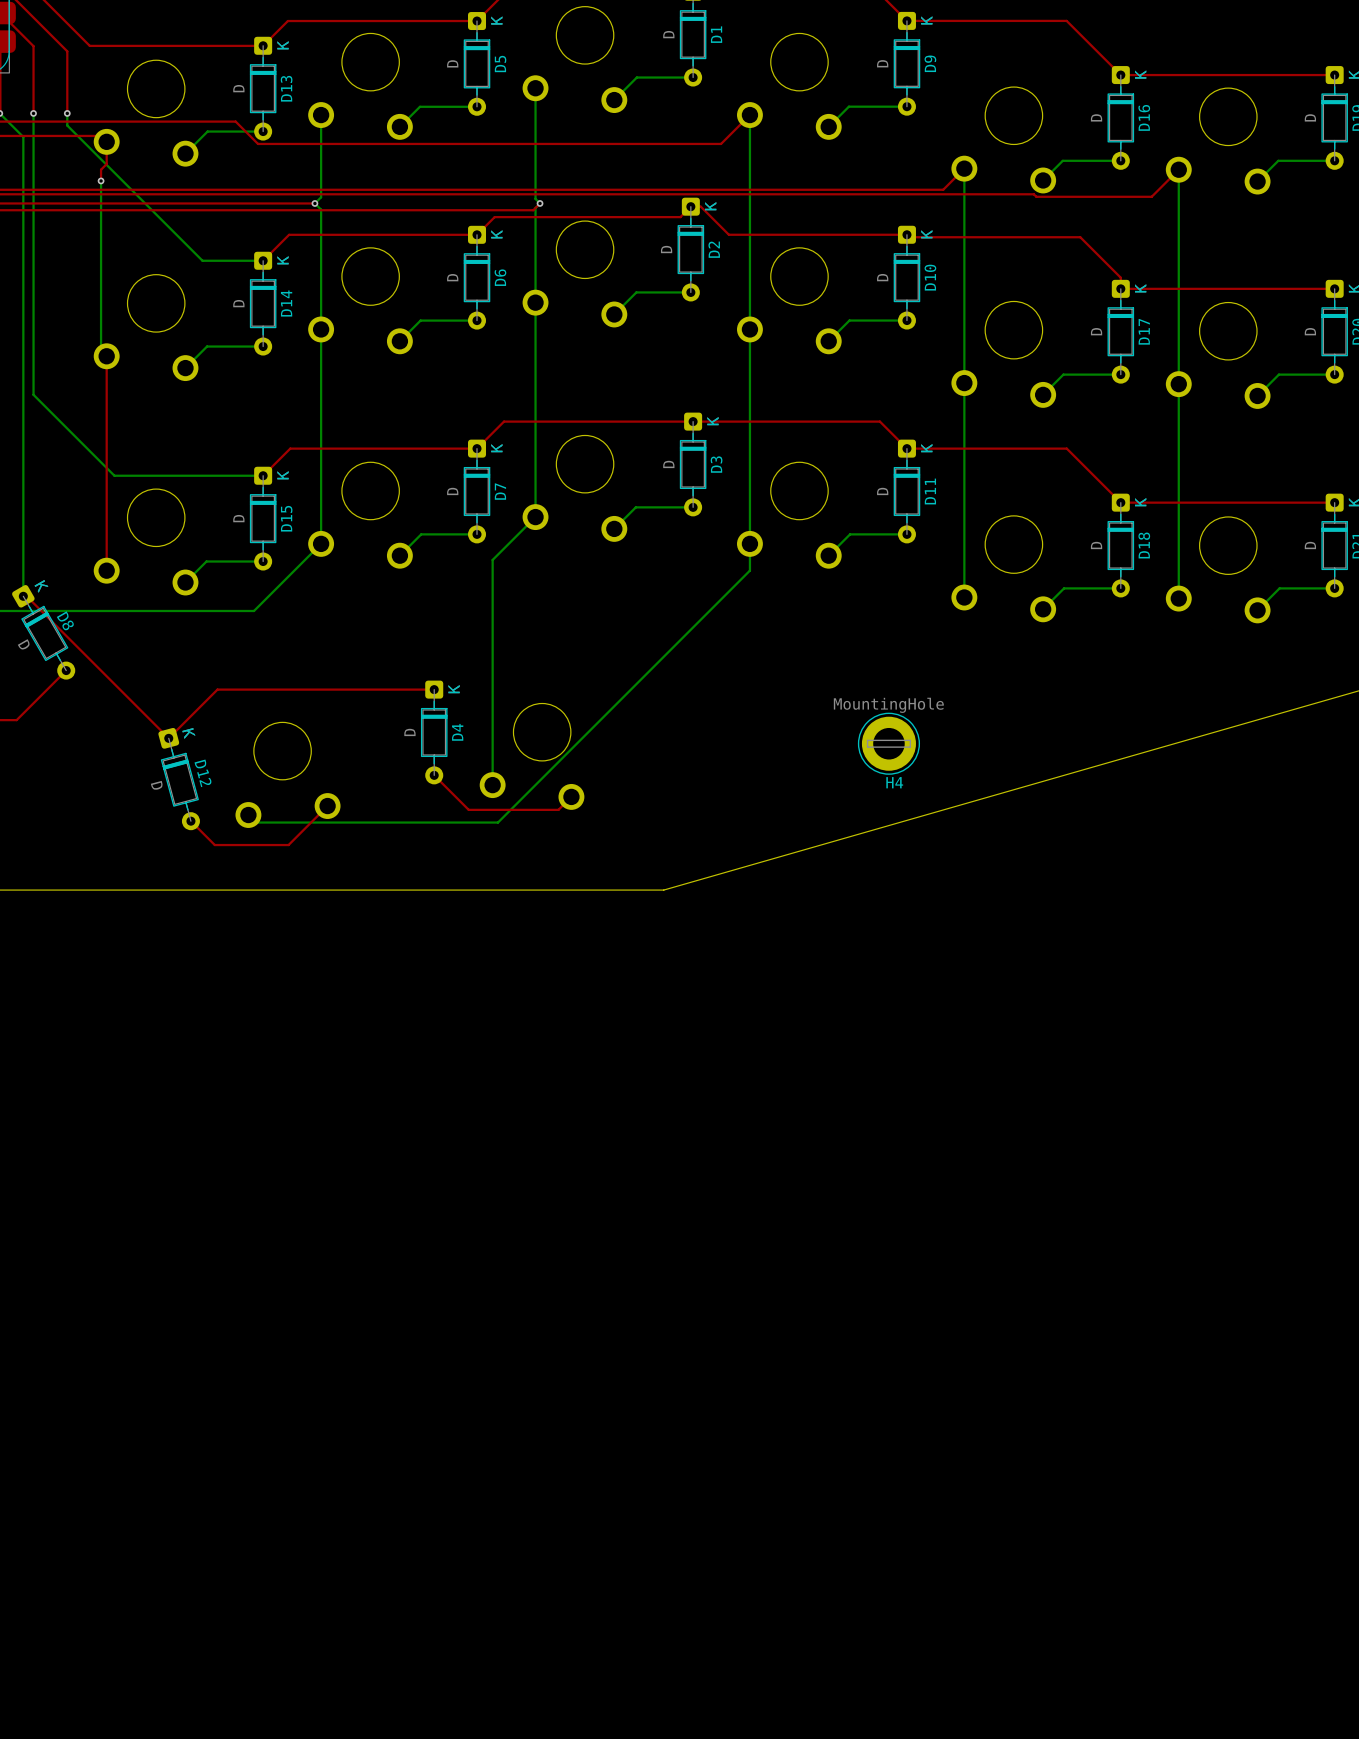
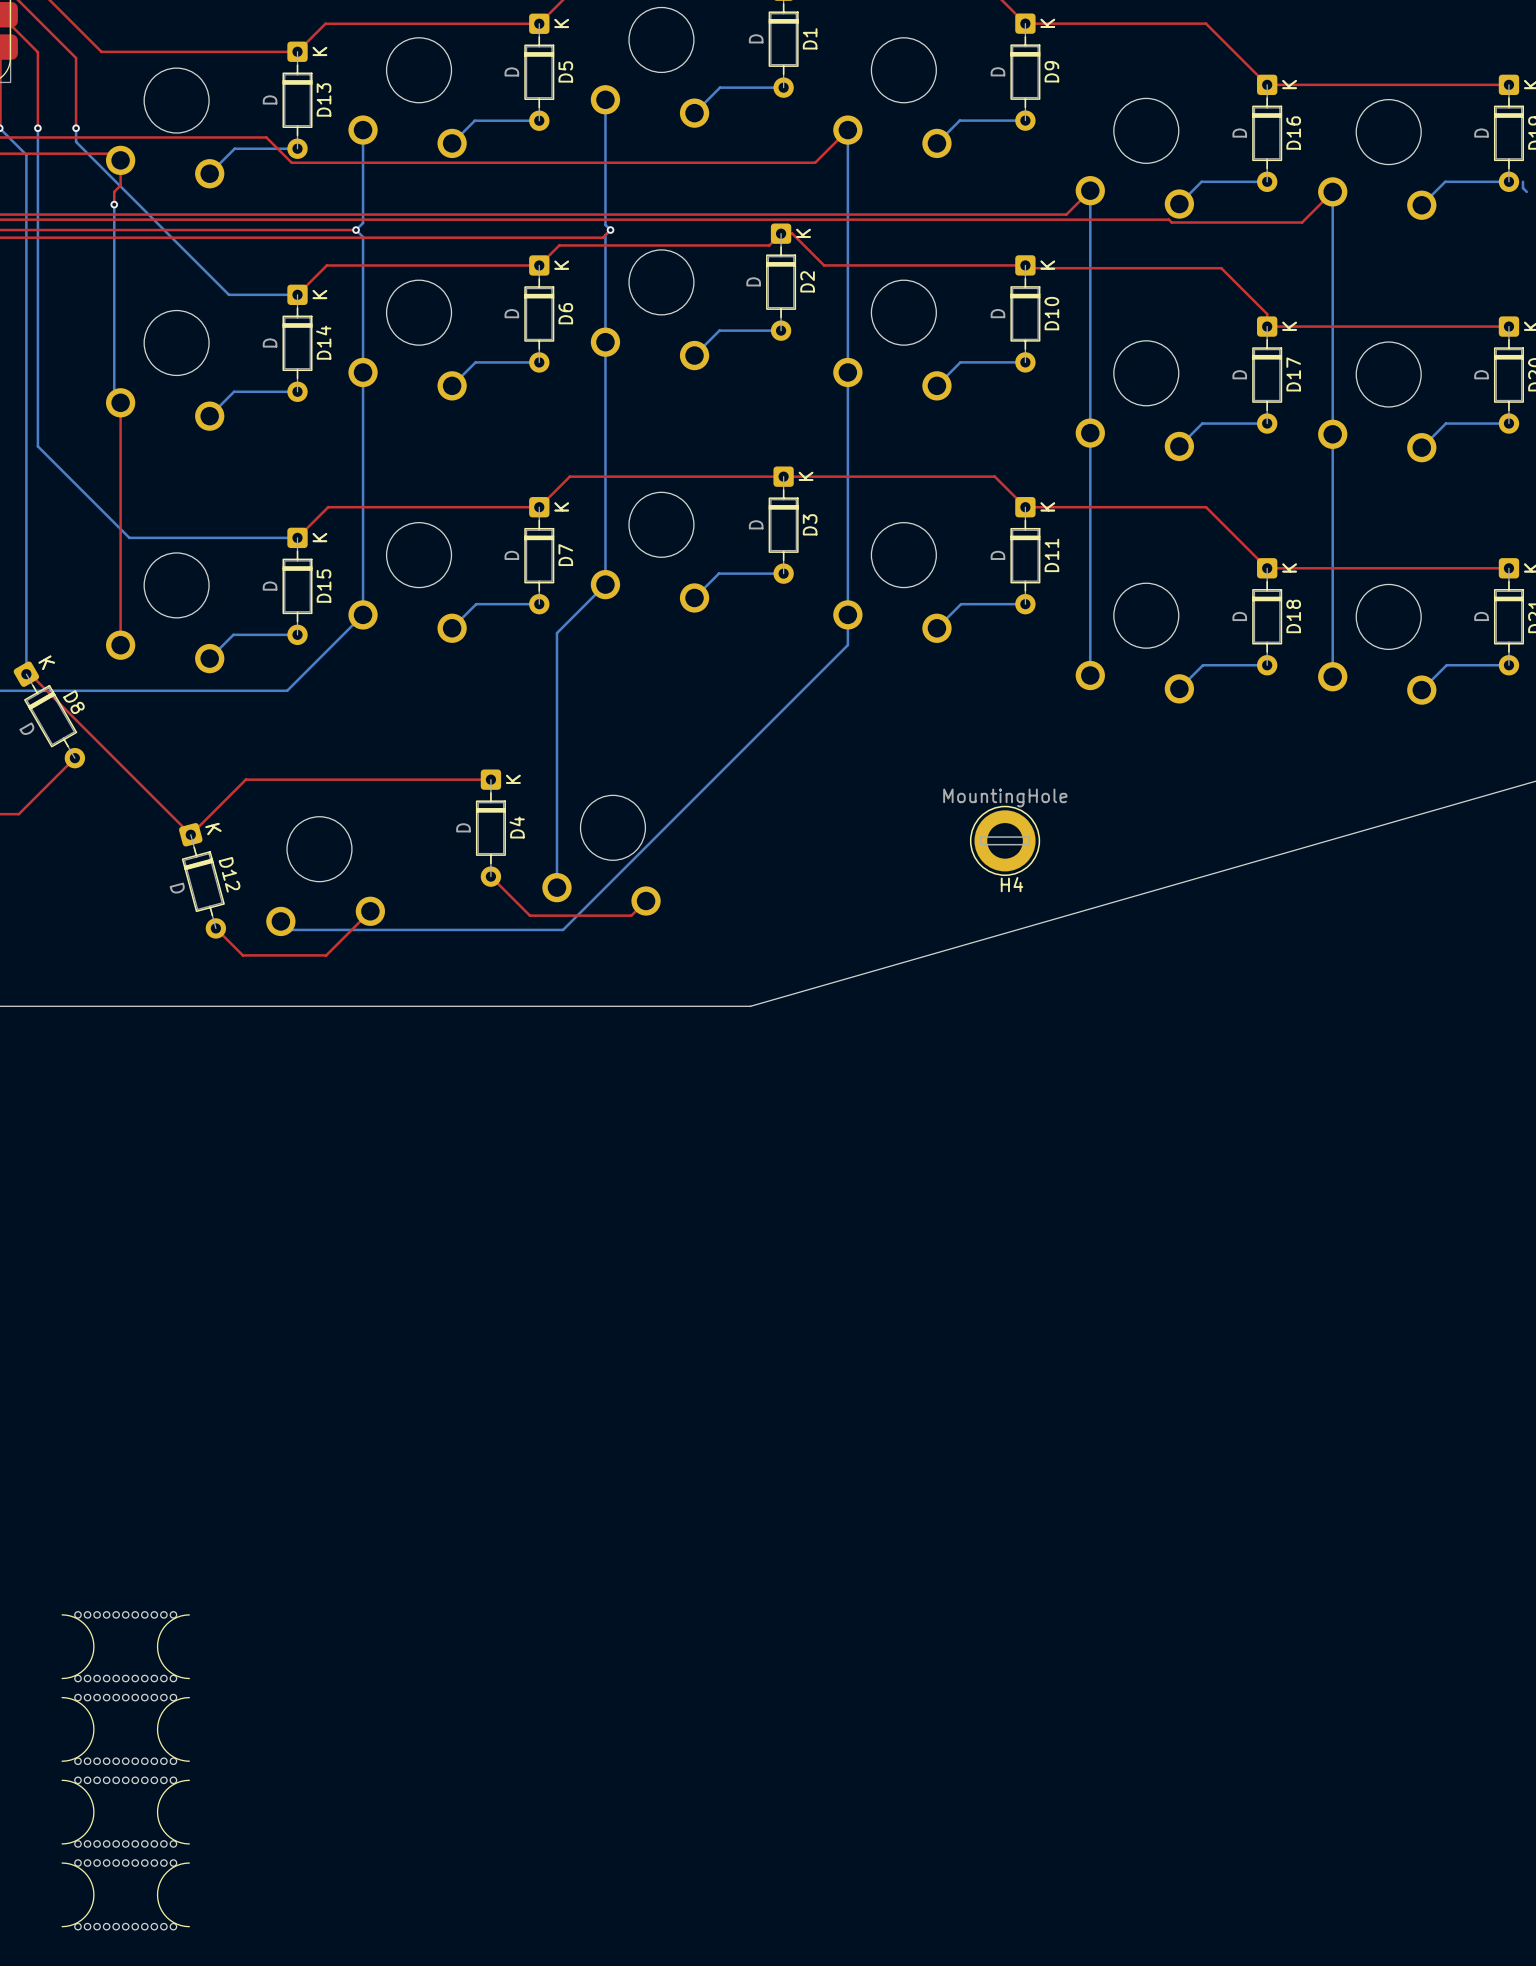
bottom track: none -> (1522, 181) (1522, 188) (1526, 191)
part: none -> (125, 1646)
part: none -> (125, 1729)
part: none -> (125, 1812)
part: none -> (125, 1894)

